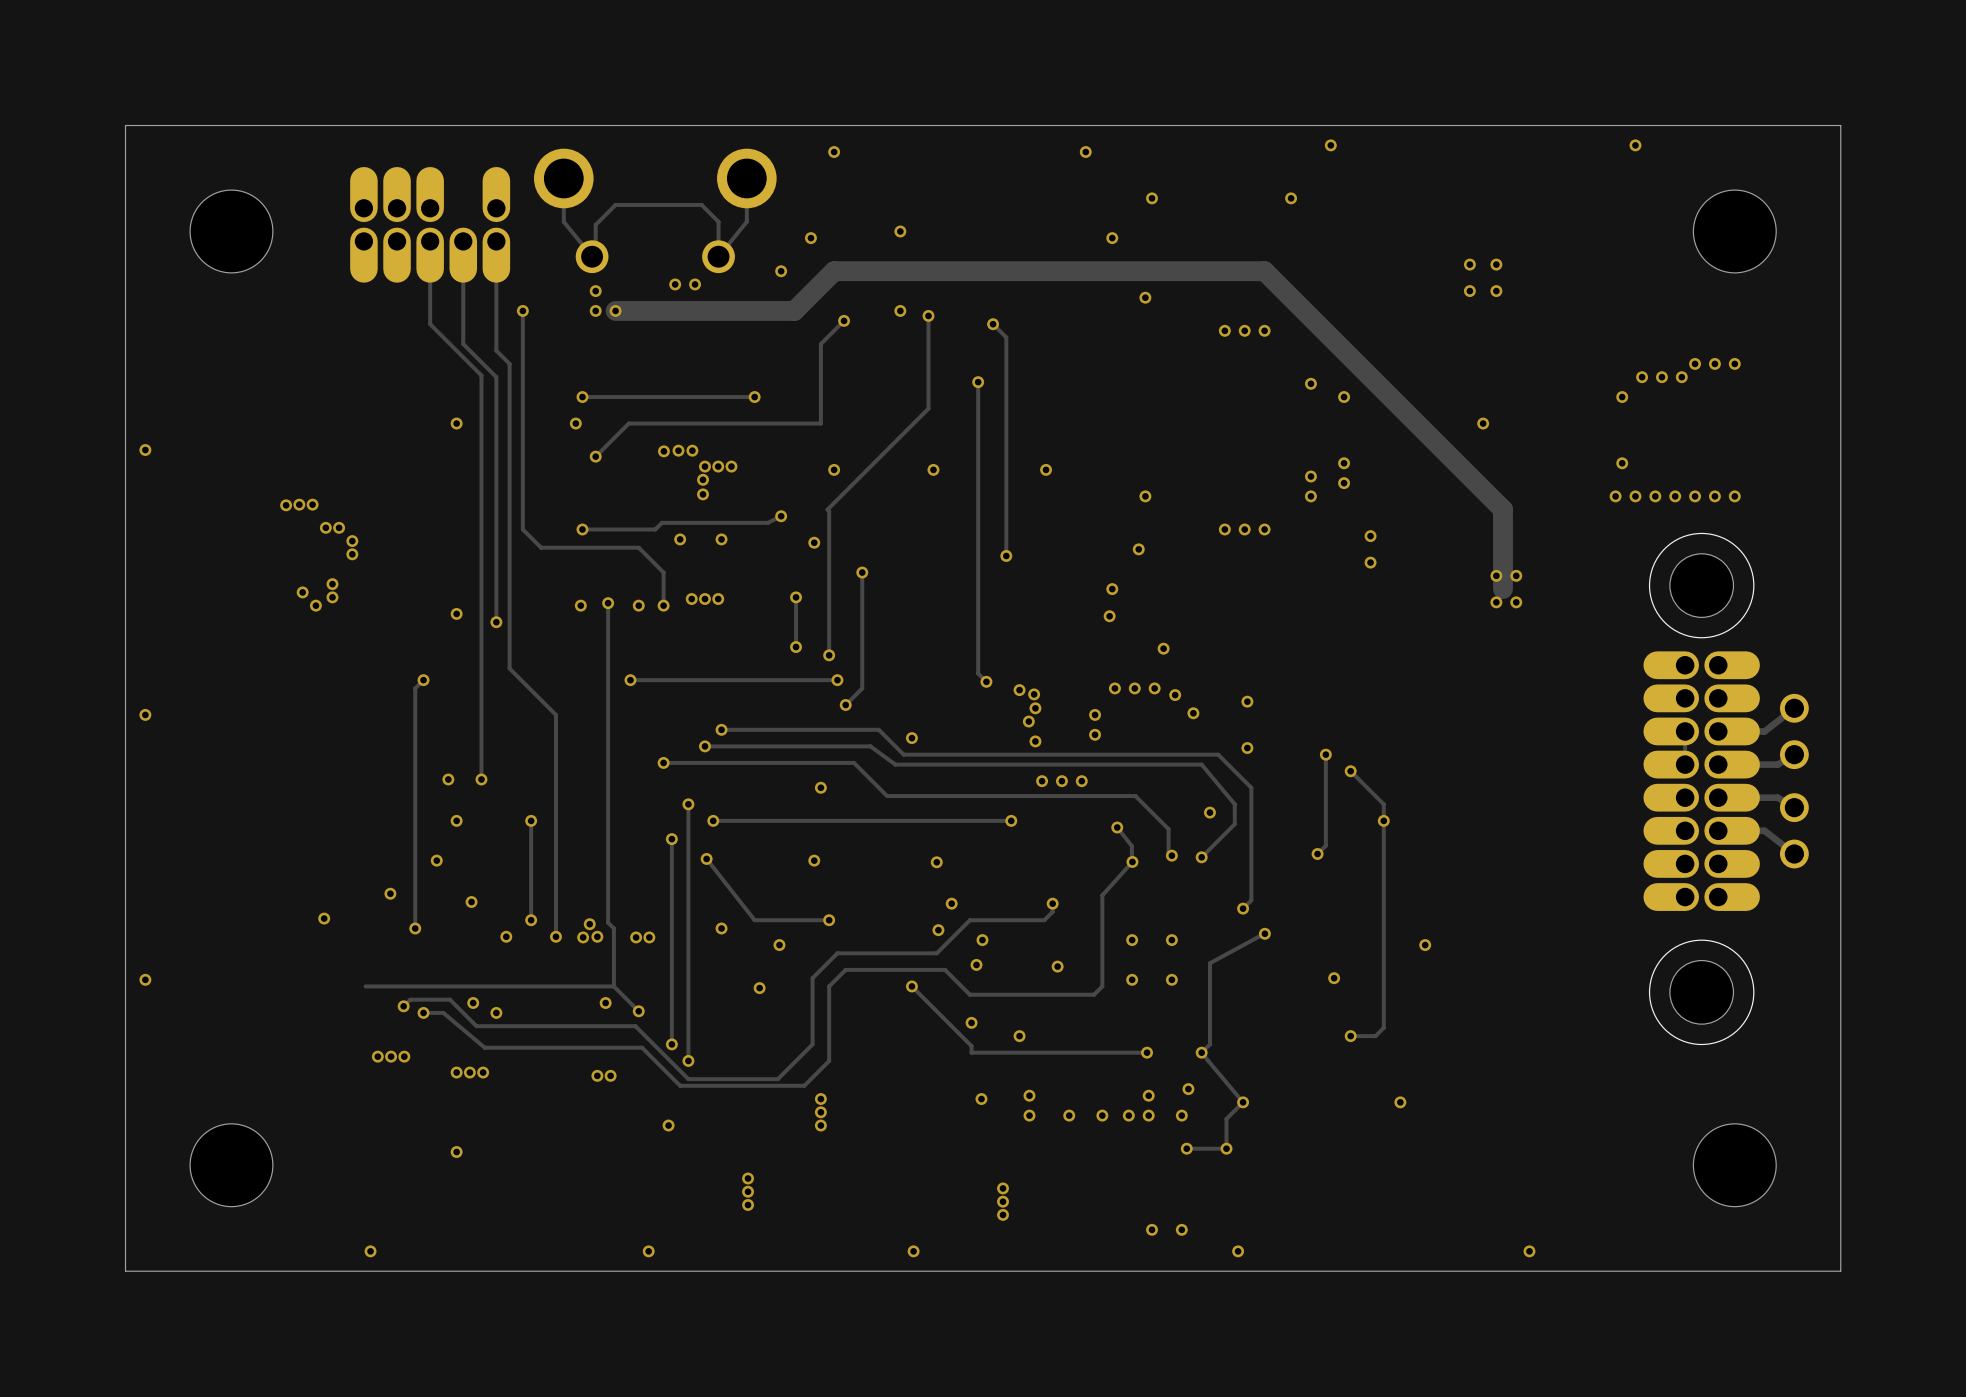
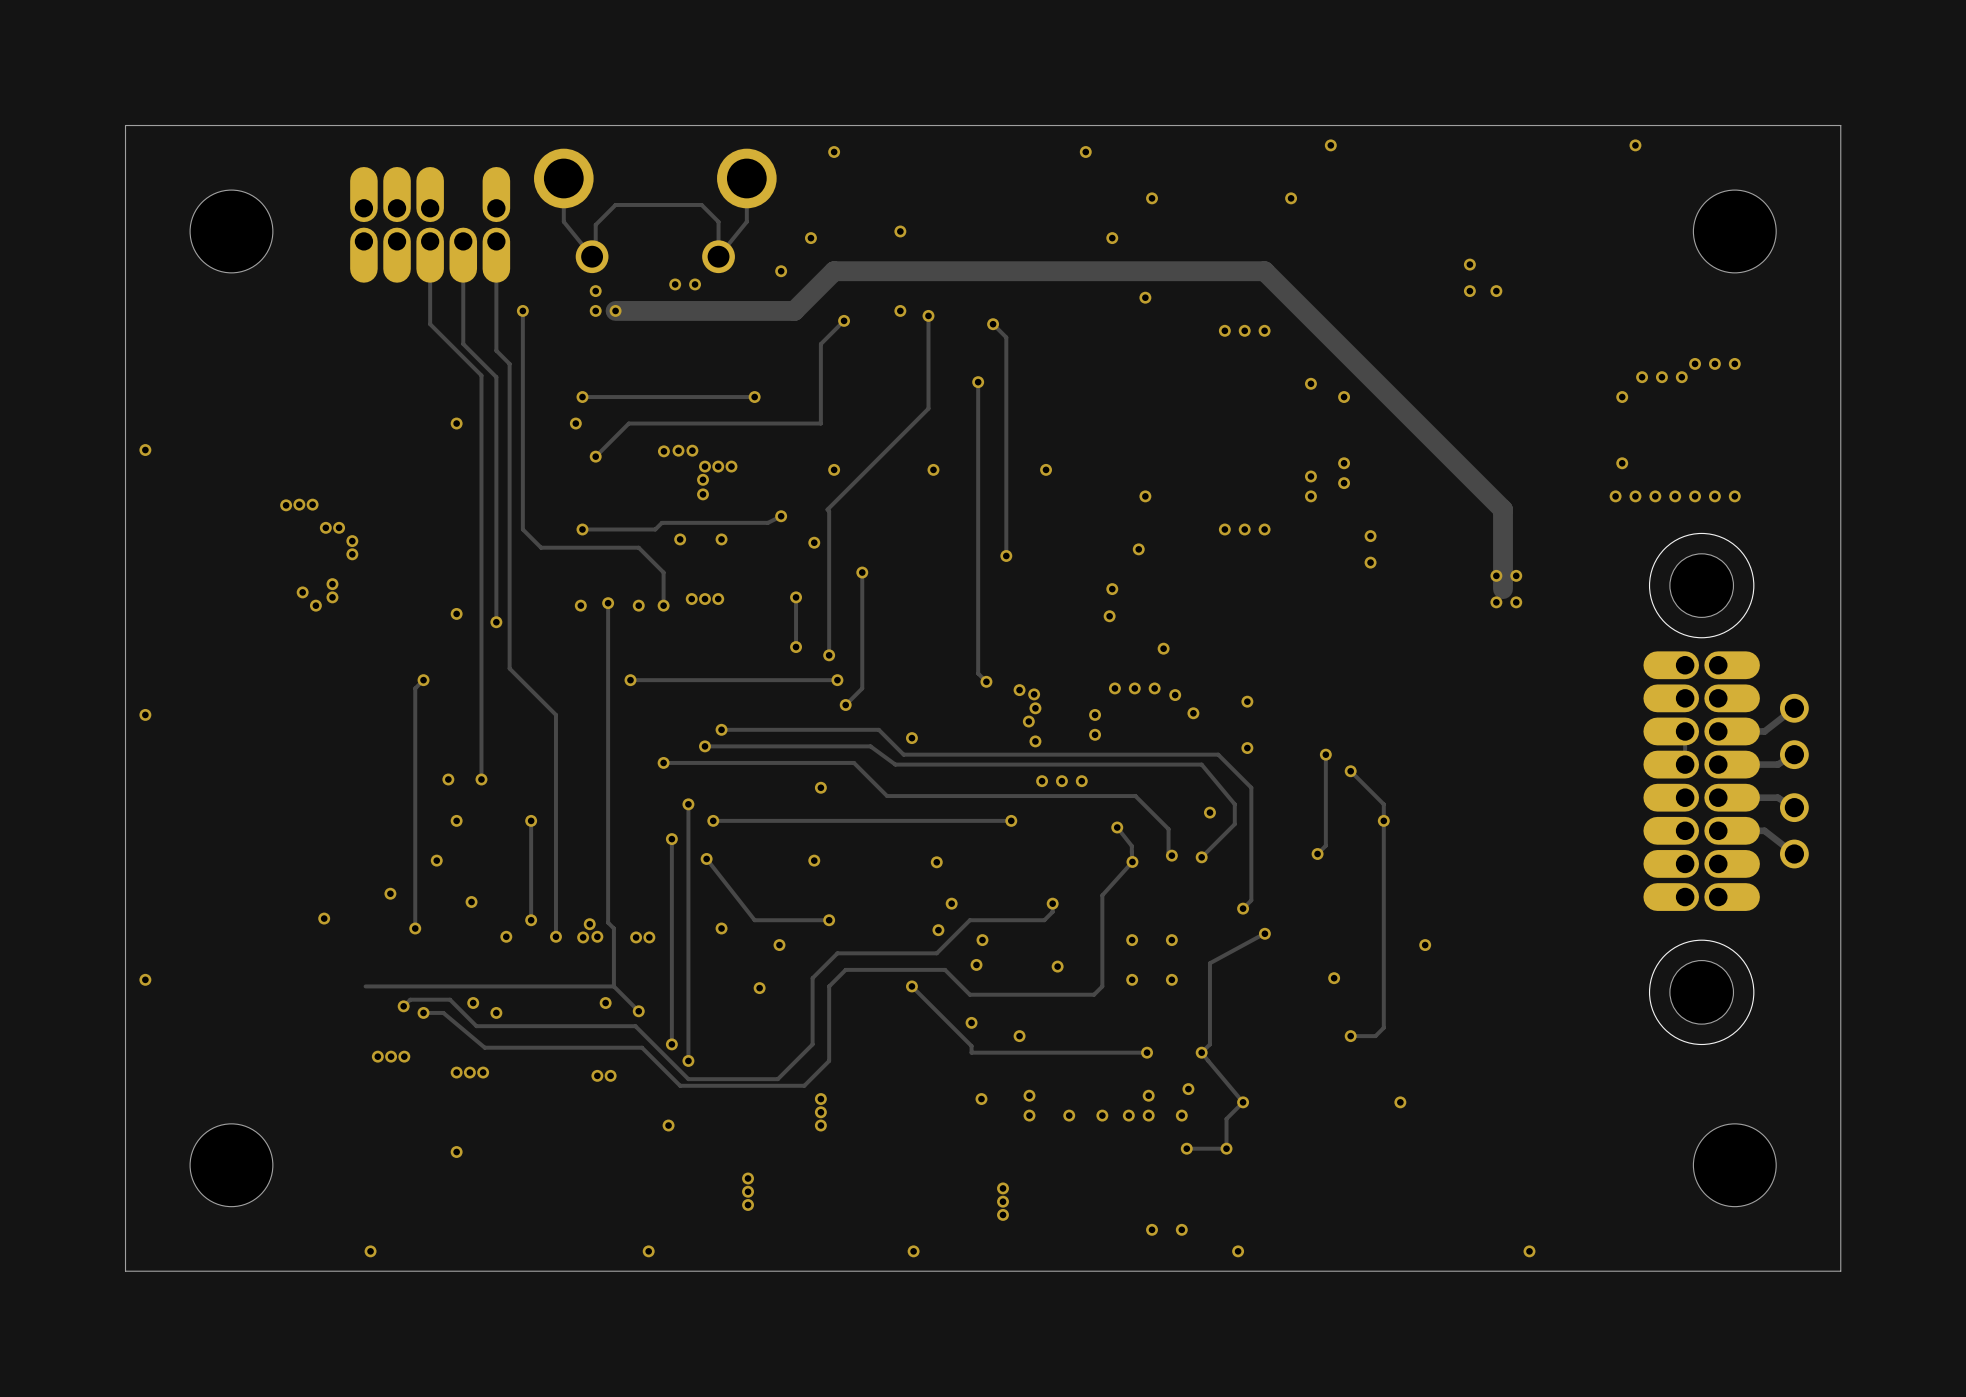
via: (1496, 264) -> none
via: (1483, 423) -> none

